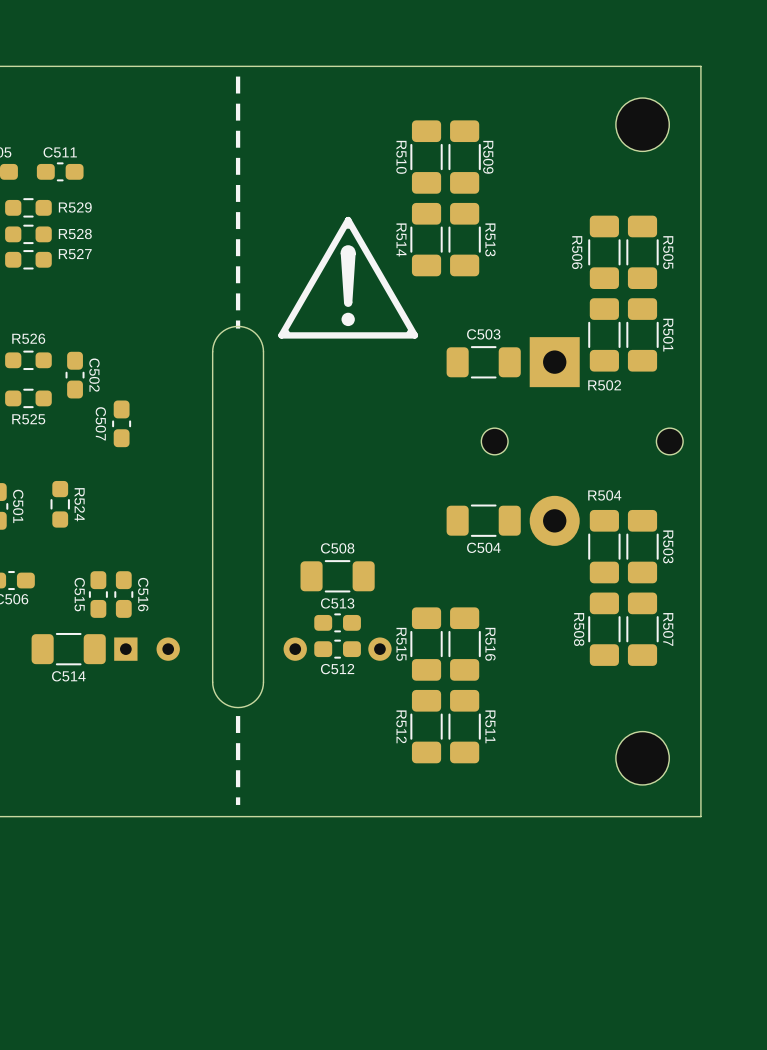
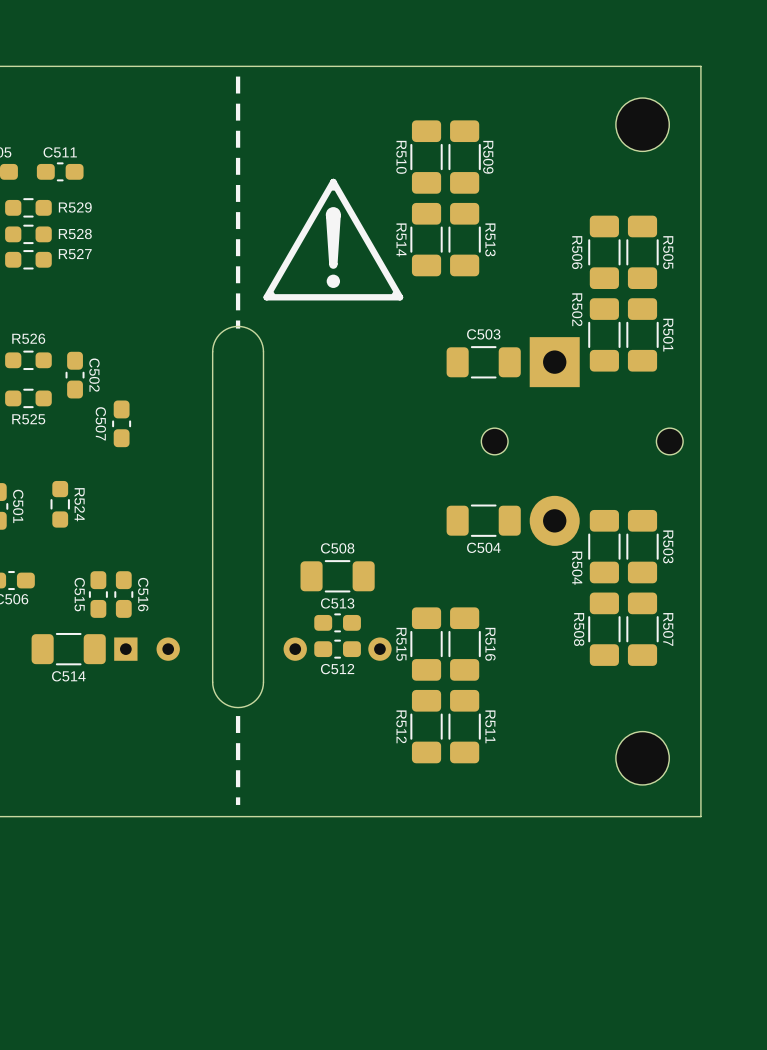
drawing position: (348, 277) -> (333, 239)
R502 name rotation: 0° (604, 385) -> 90° clockwise (577, 309)
R502 name position: R502 (604, 385) -> R502 (577, 309)
R504 name rotation: 0° (604, 495) -> 90° clockwise (577, 568)
R504 name position: R504 (604, 495) -> R504 (577, 568)

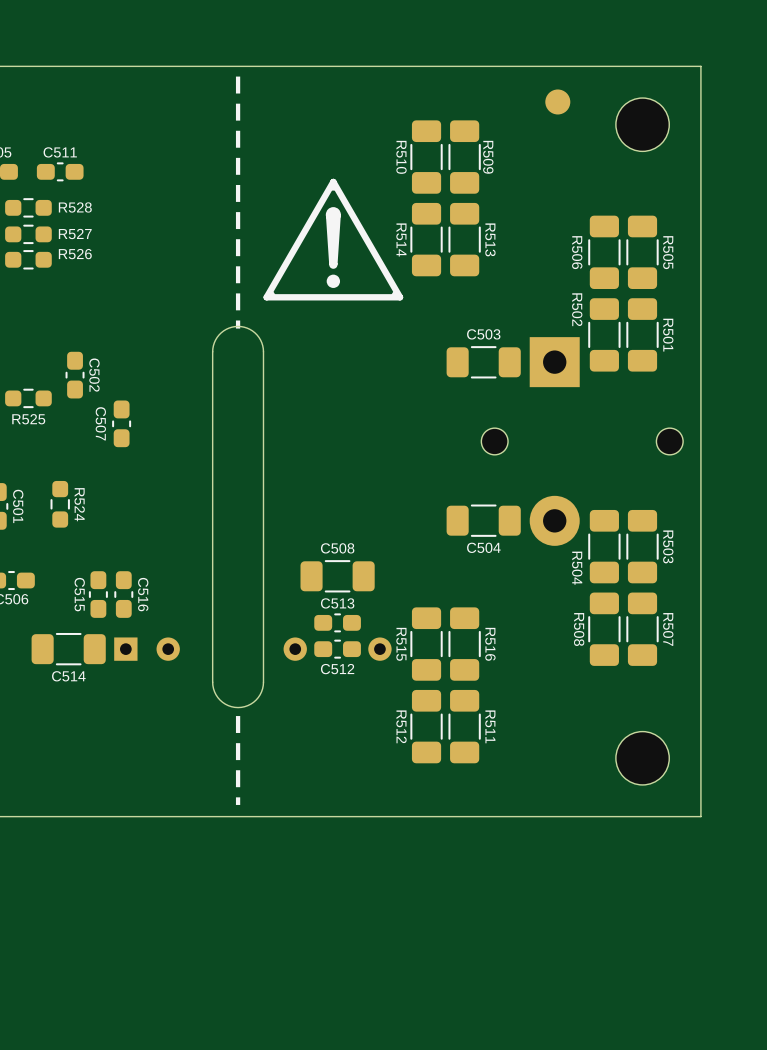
part: none -> (557, 101)
R529 name: R529 (75, 207) -> R528 (75, 207)
R528 name: R528 (75, 234) -> R527 (75, 234)
R527 name: R527 (75, 254) -> R526 (75, 254)
R526: (28, 360) -> none

